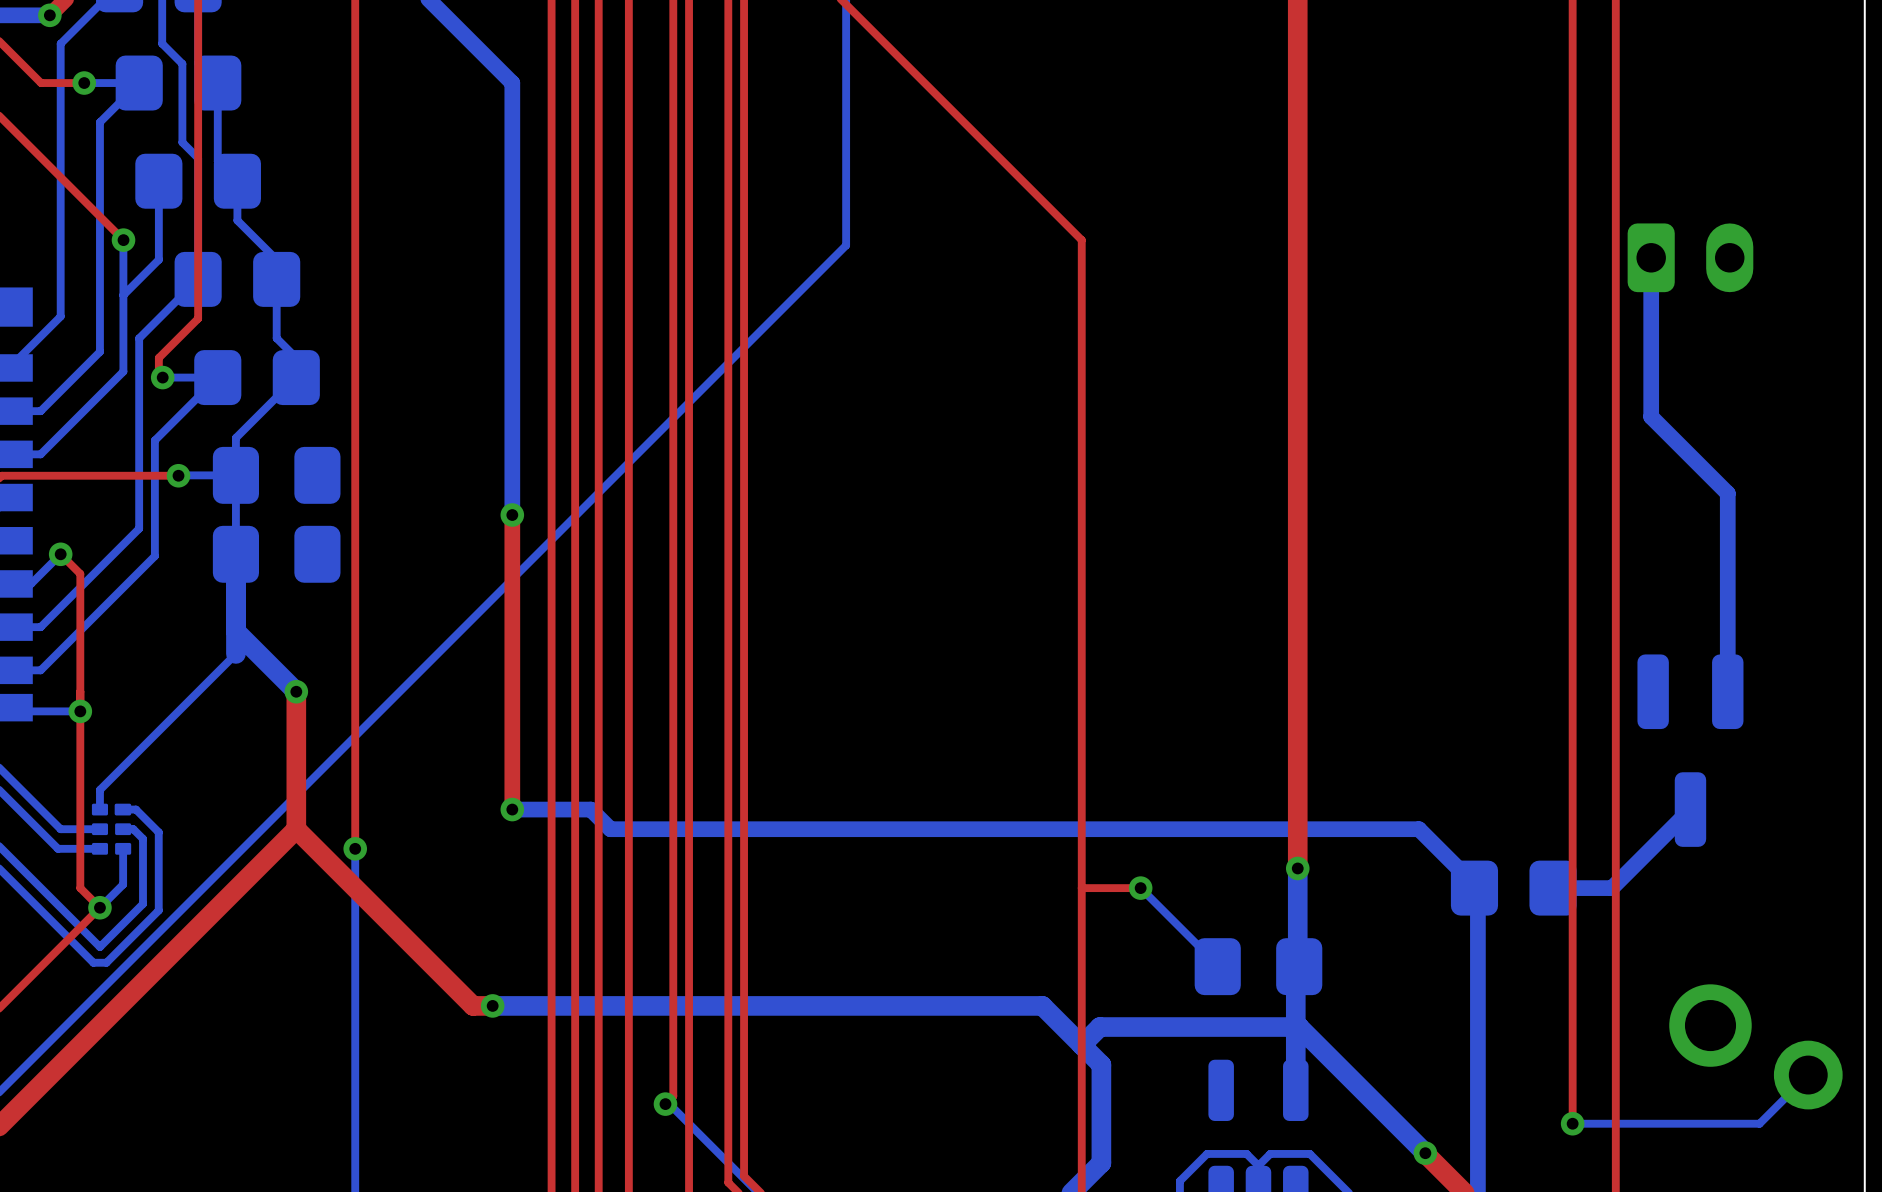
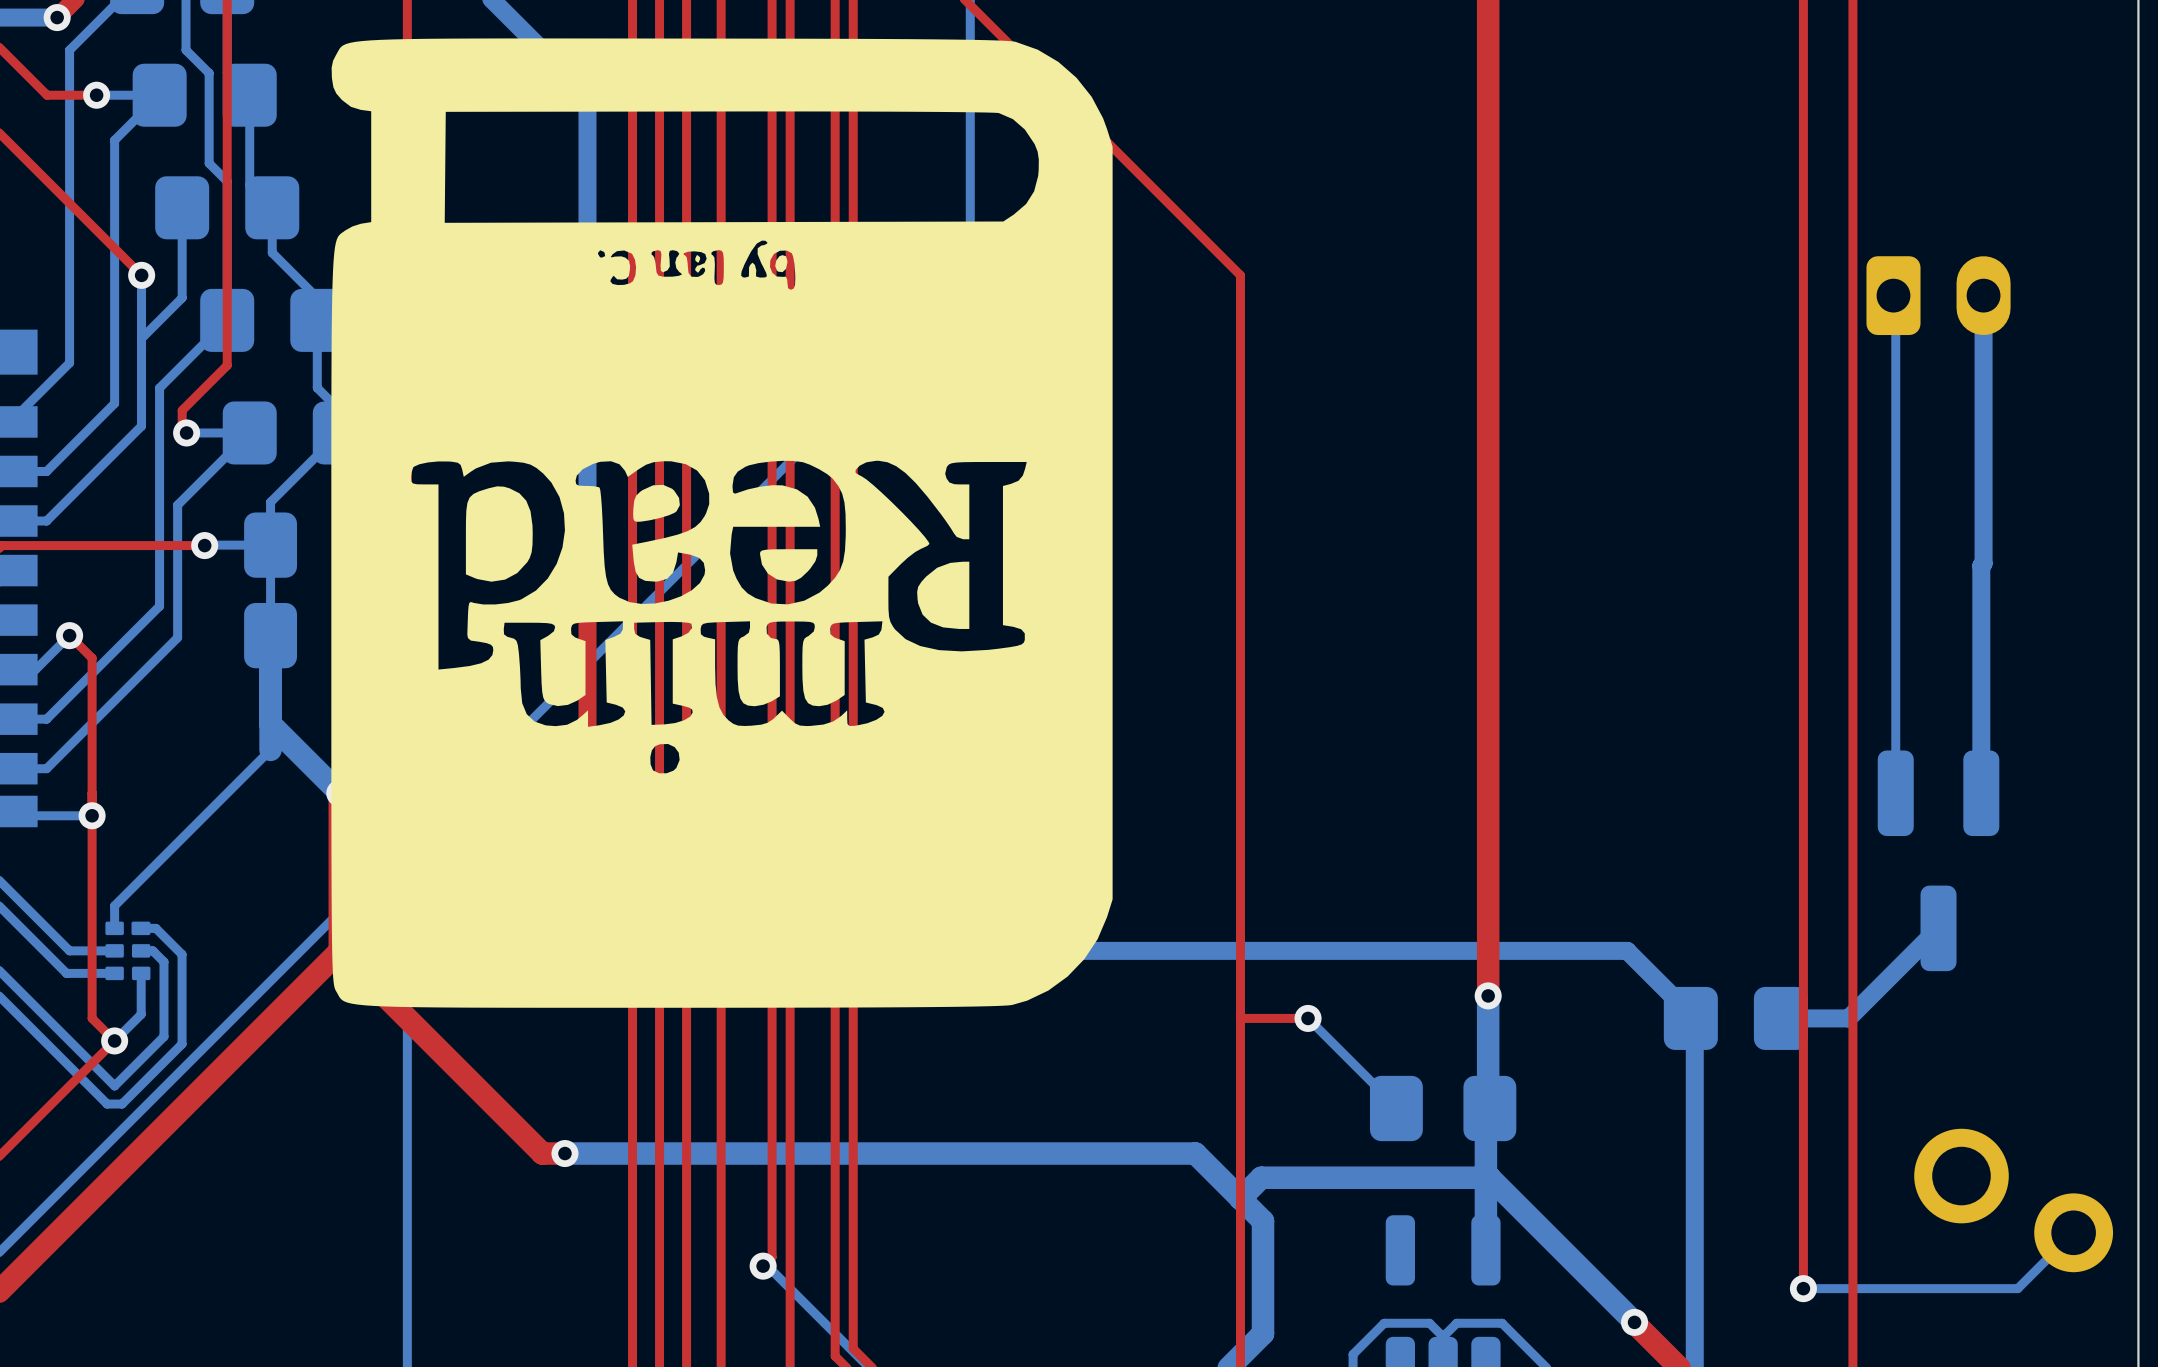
drawing: none -> [331, 38, 1113, 1008]
bottom track: (1651, 257) (1651, 416) (1727, 493) -> (1983, 295) (1983, 563) (1981, 565)
bottom track: none -> (1893, 295) (1895, 297) (1895, 793)

